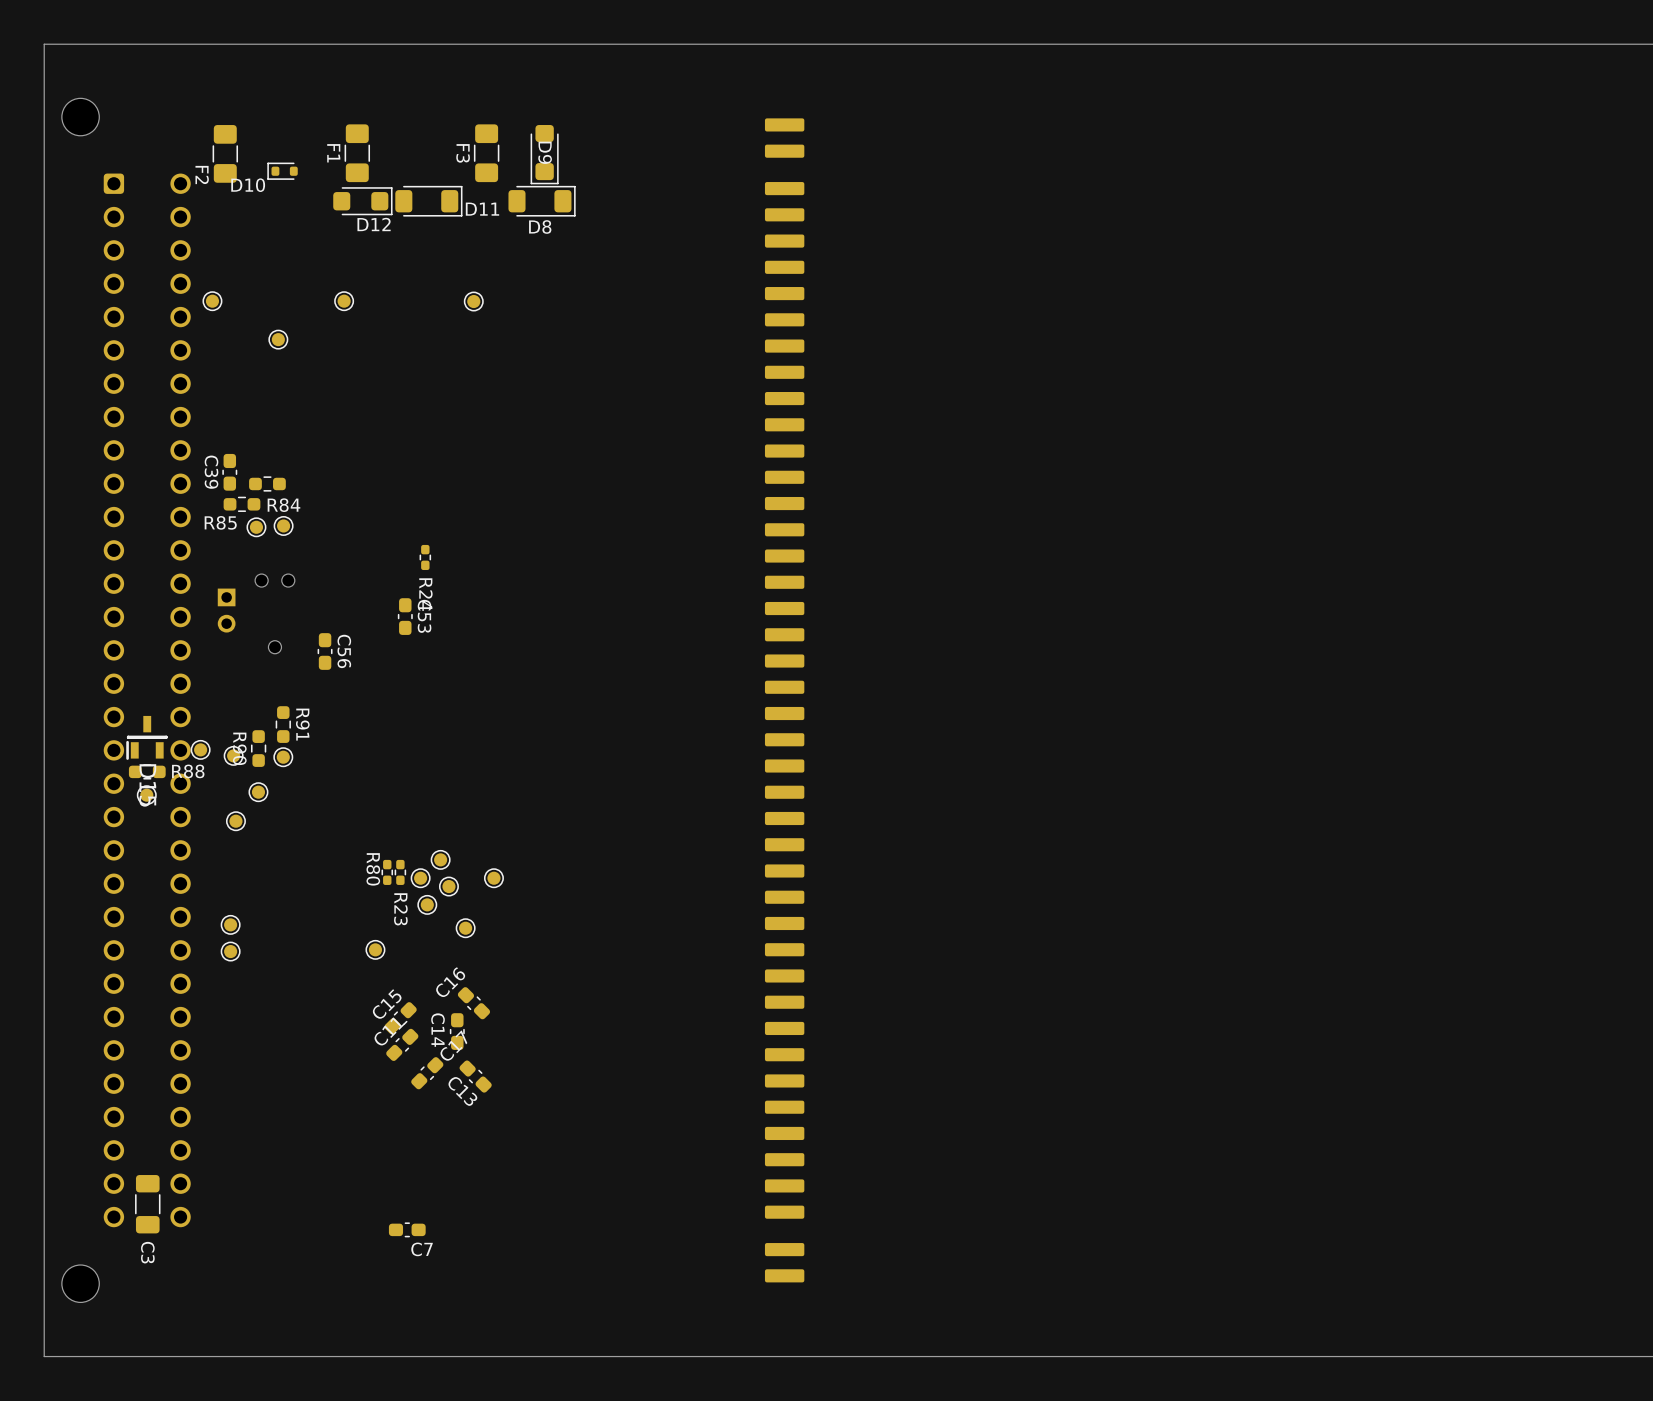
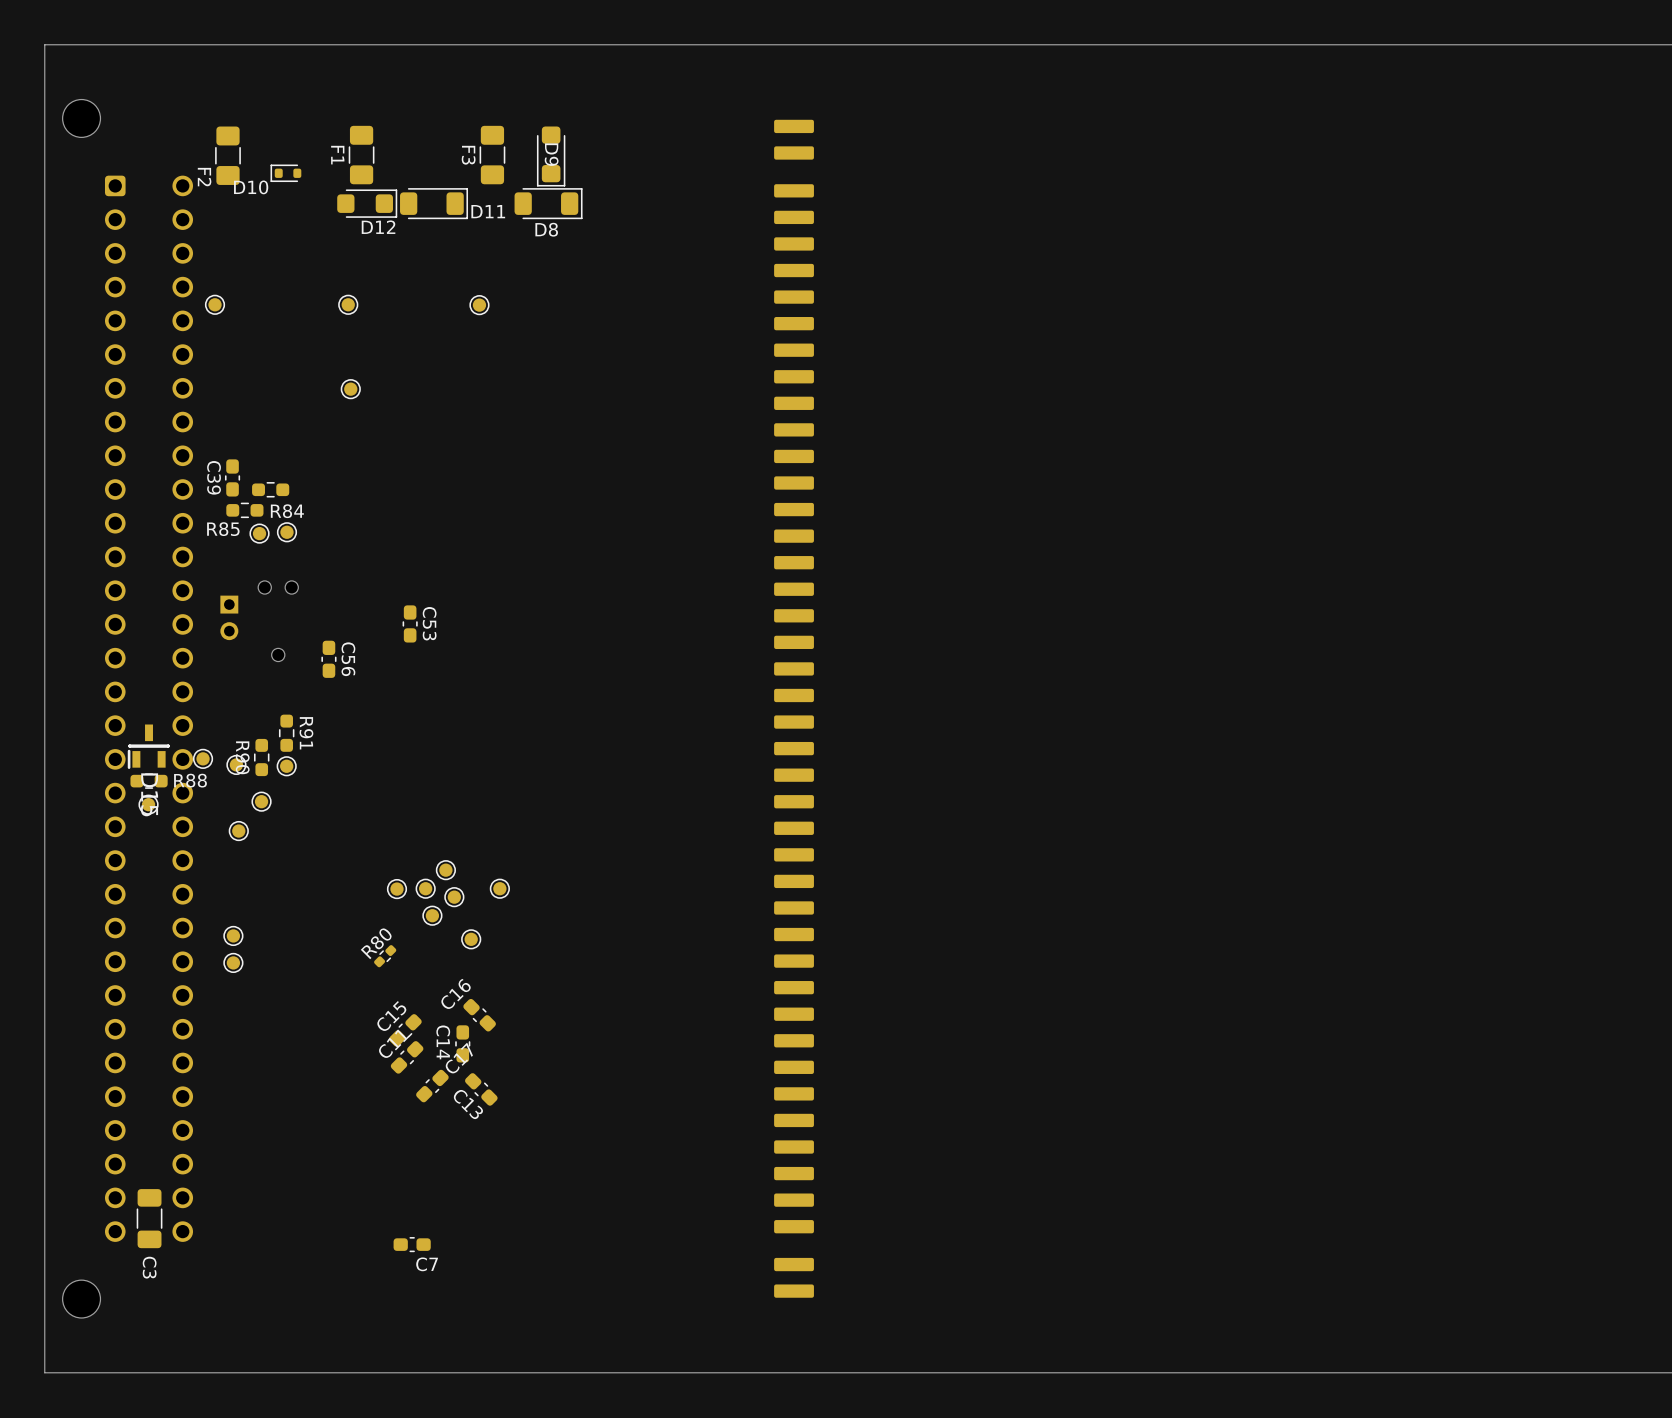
part position: (278, 339) -> (350, 389)
R24: (425, 557) -> none
R80 rotation: 0° (387, 872) -> 45° clockwise (385, 956)
R80 position: (387, 872) -> (385, 956)
R23: (400, 872) -> none
part position: (375, 949) -> (396, 889)

